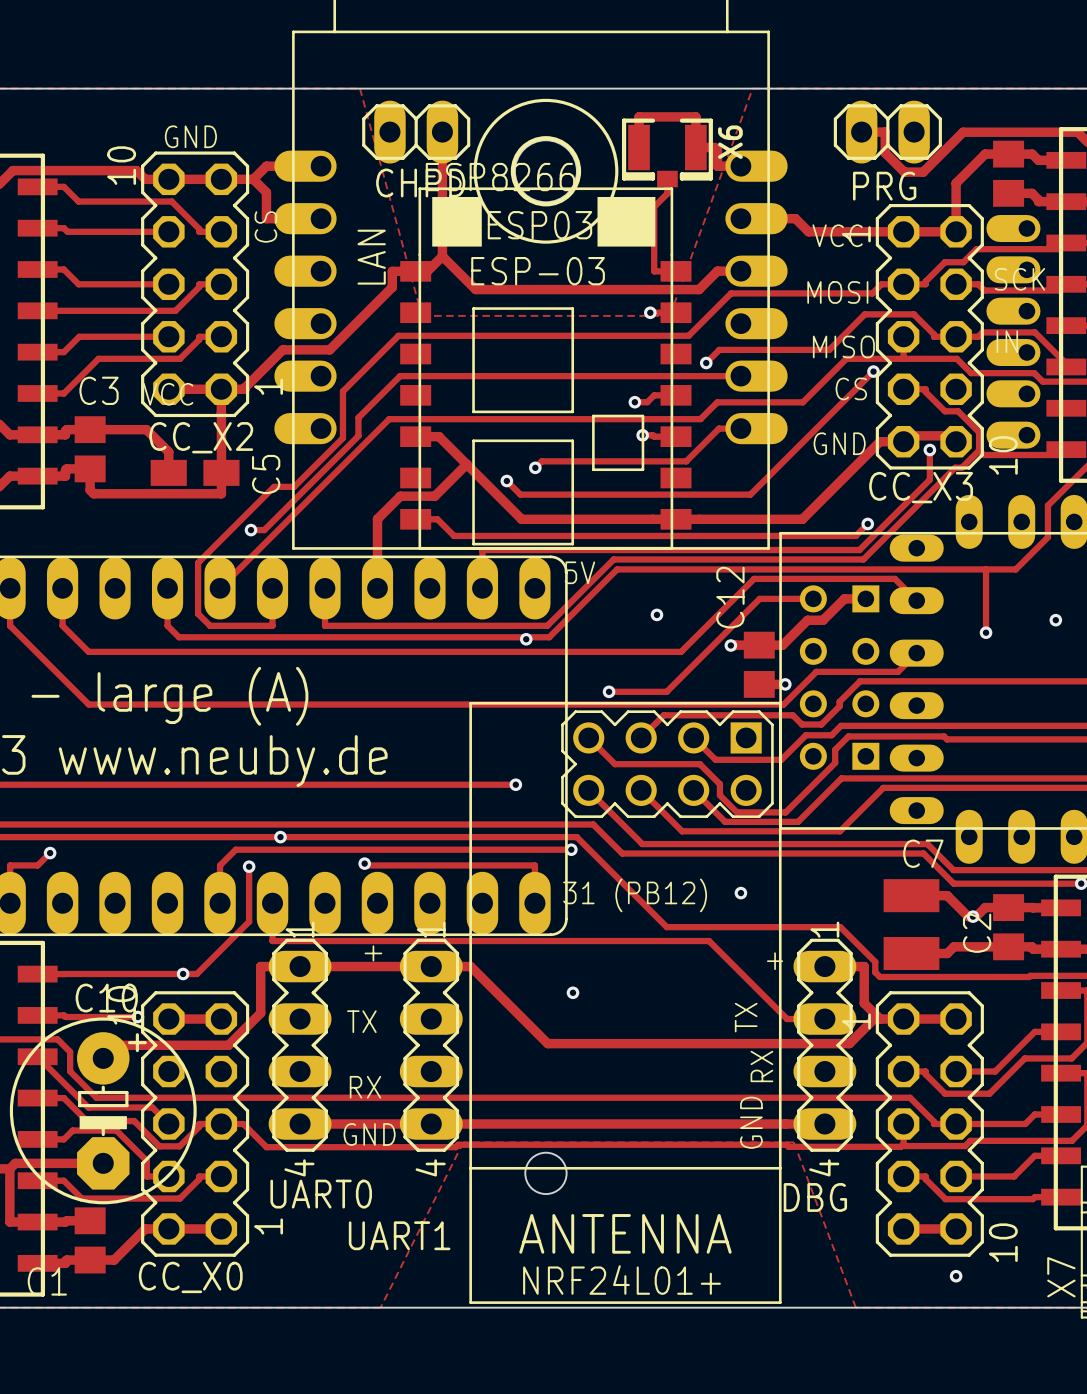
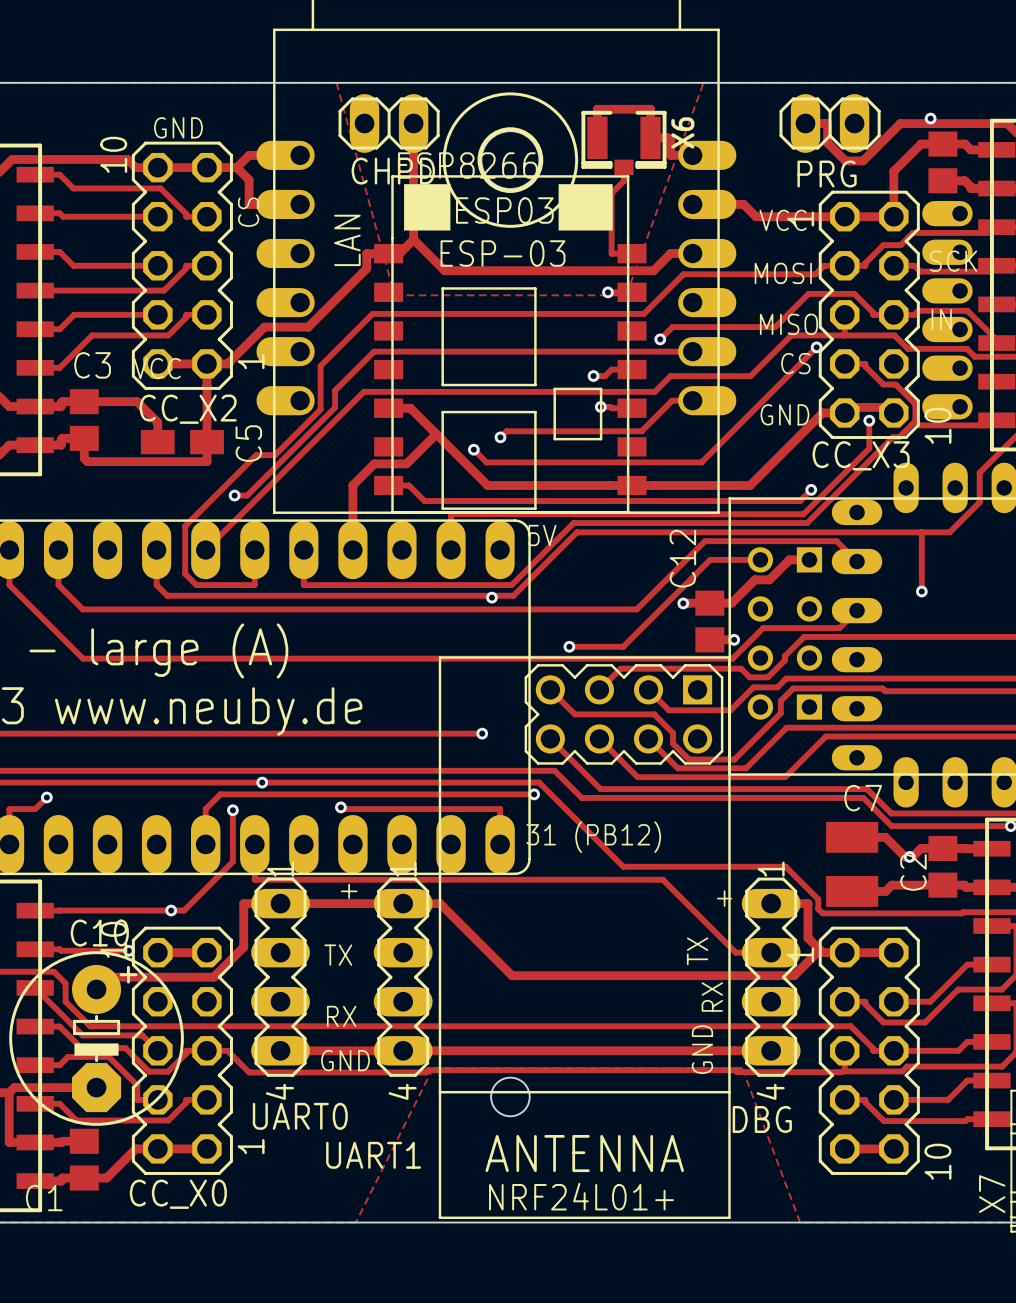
via: none -> (930, 118)
via: (656, 614) -> none
via: (1055, 620) -> none
via: (740, 893) -> none
via: (572, 992) -> none
via: (956, 1276) -> none

